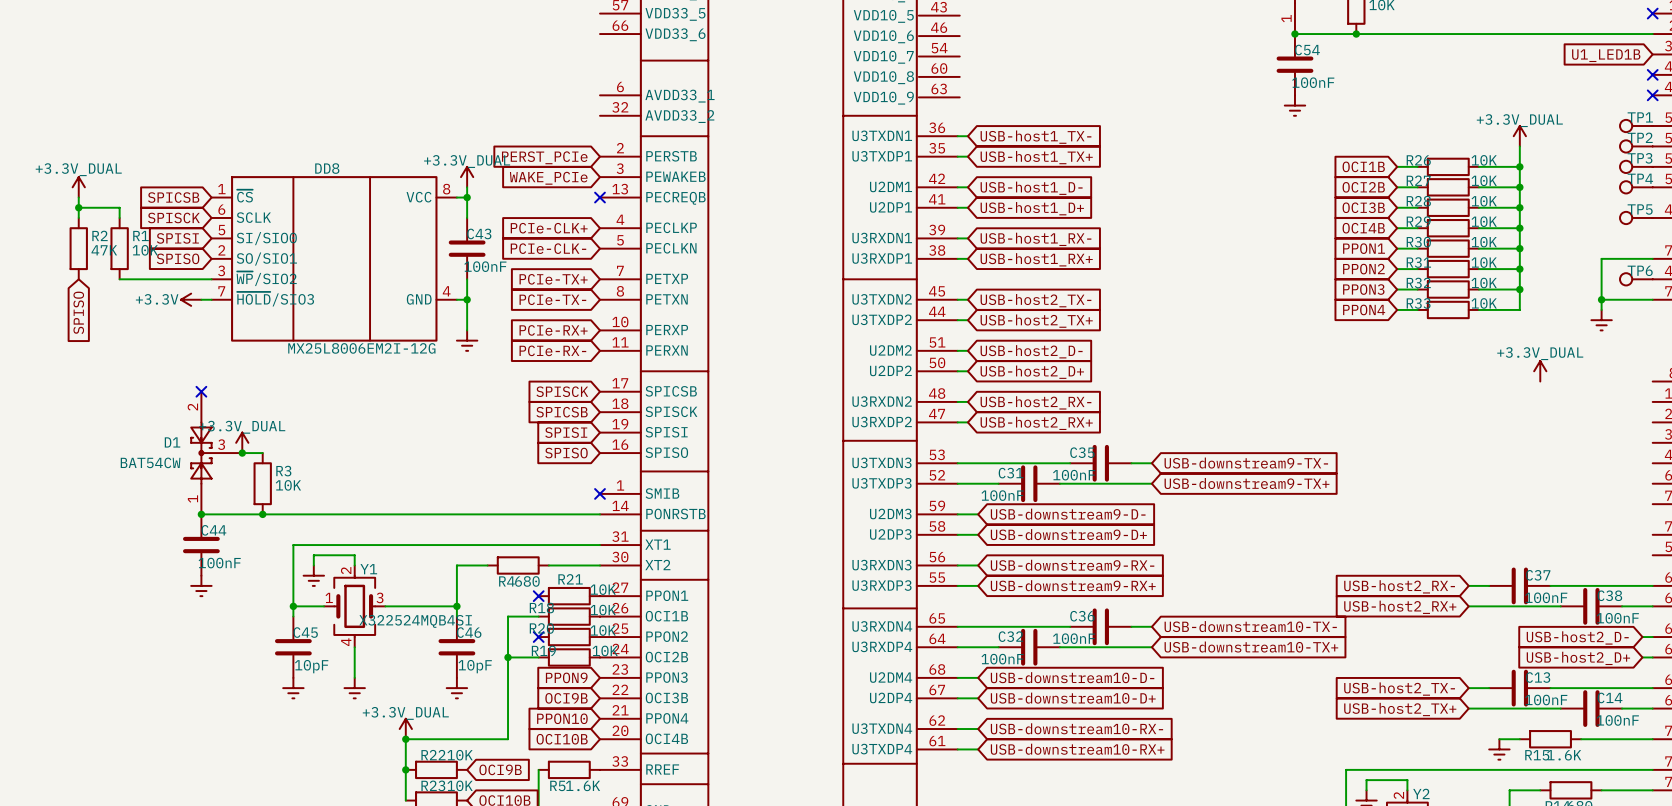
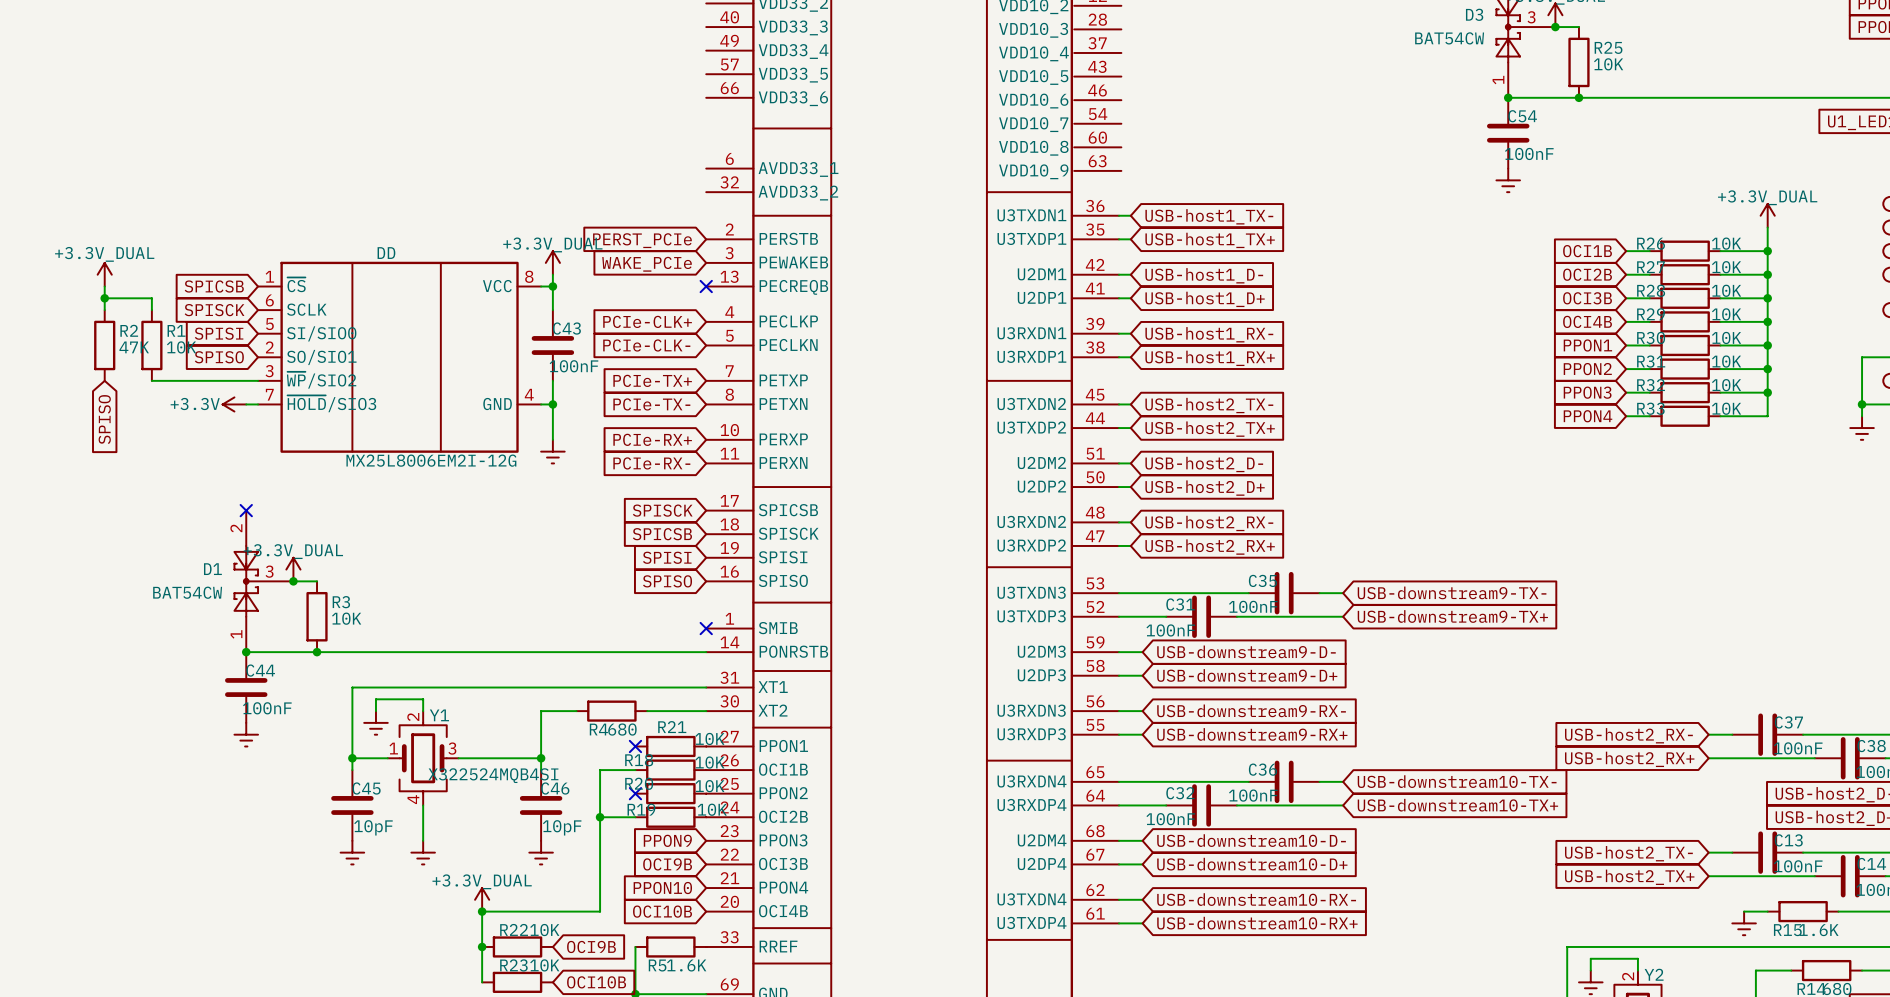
DD8 name: DD8 (327, 168) -> DD (386, 253)
power symbol: +3.3V_DUAL (1540, 371) -> none

